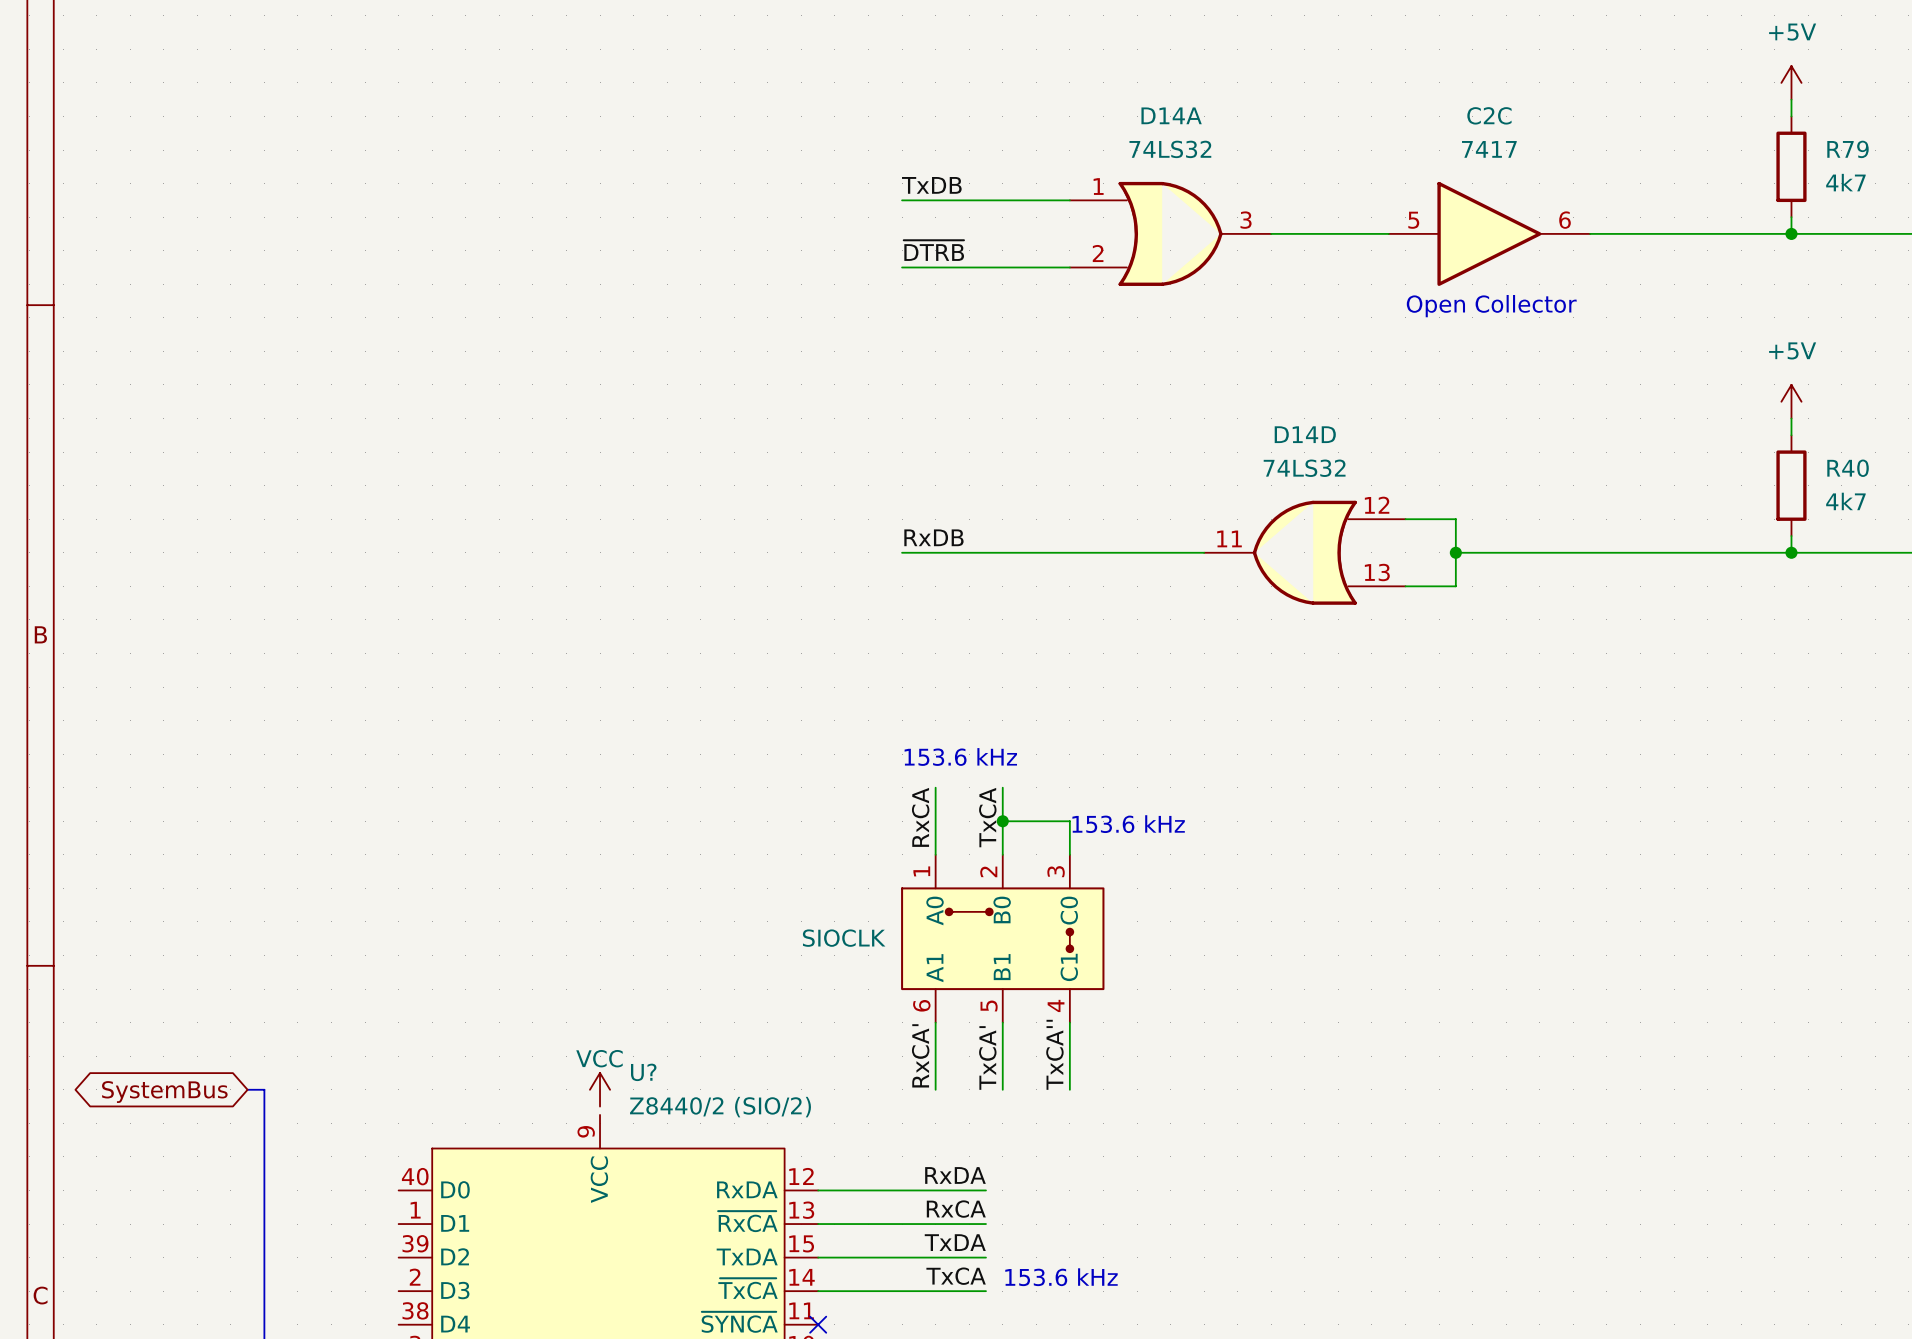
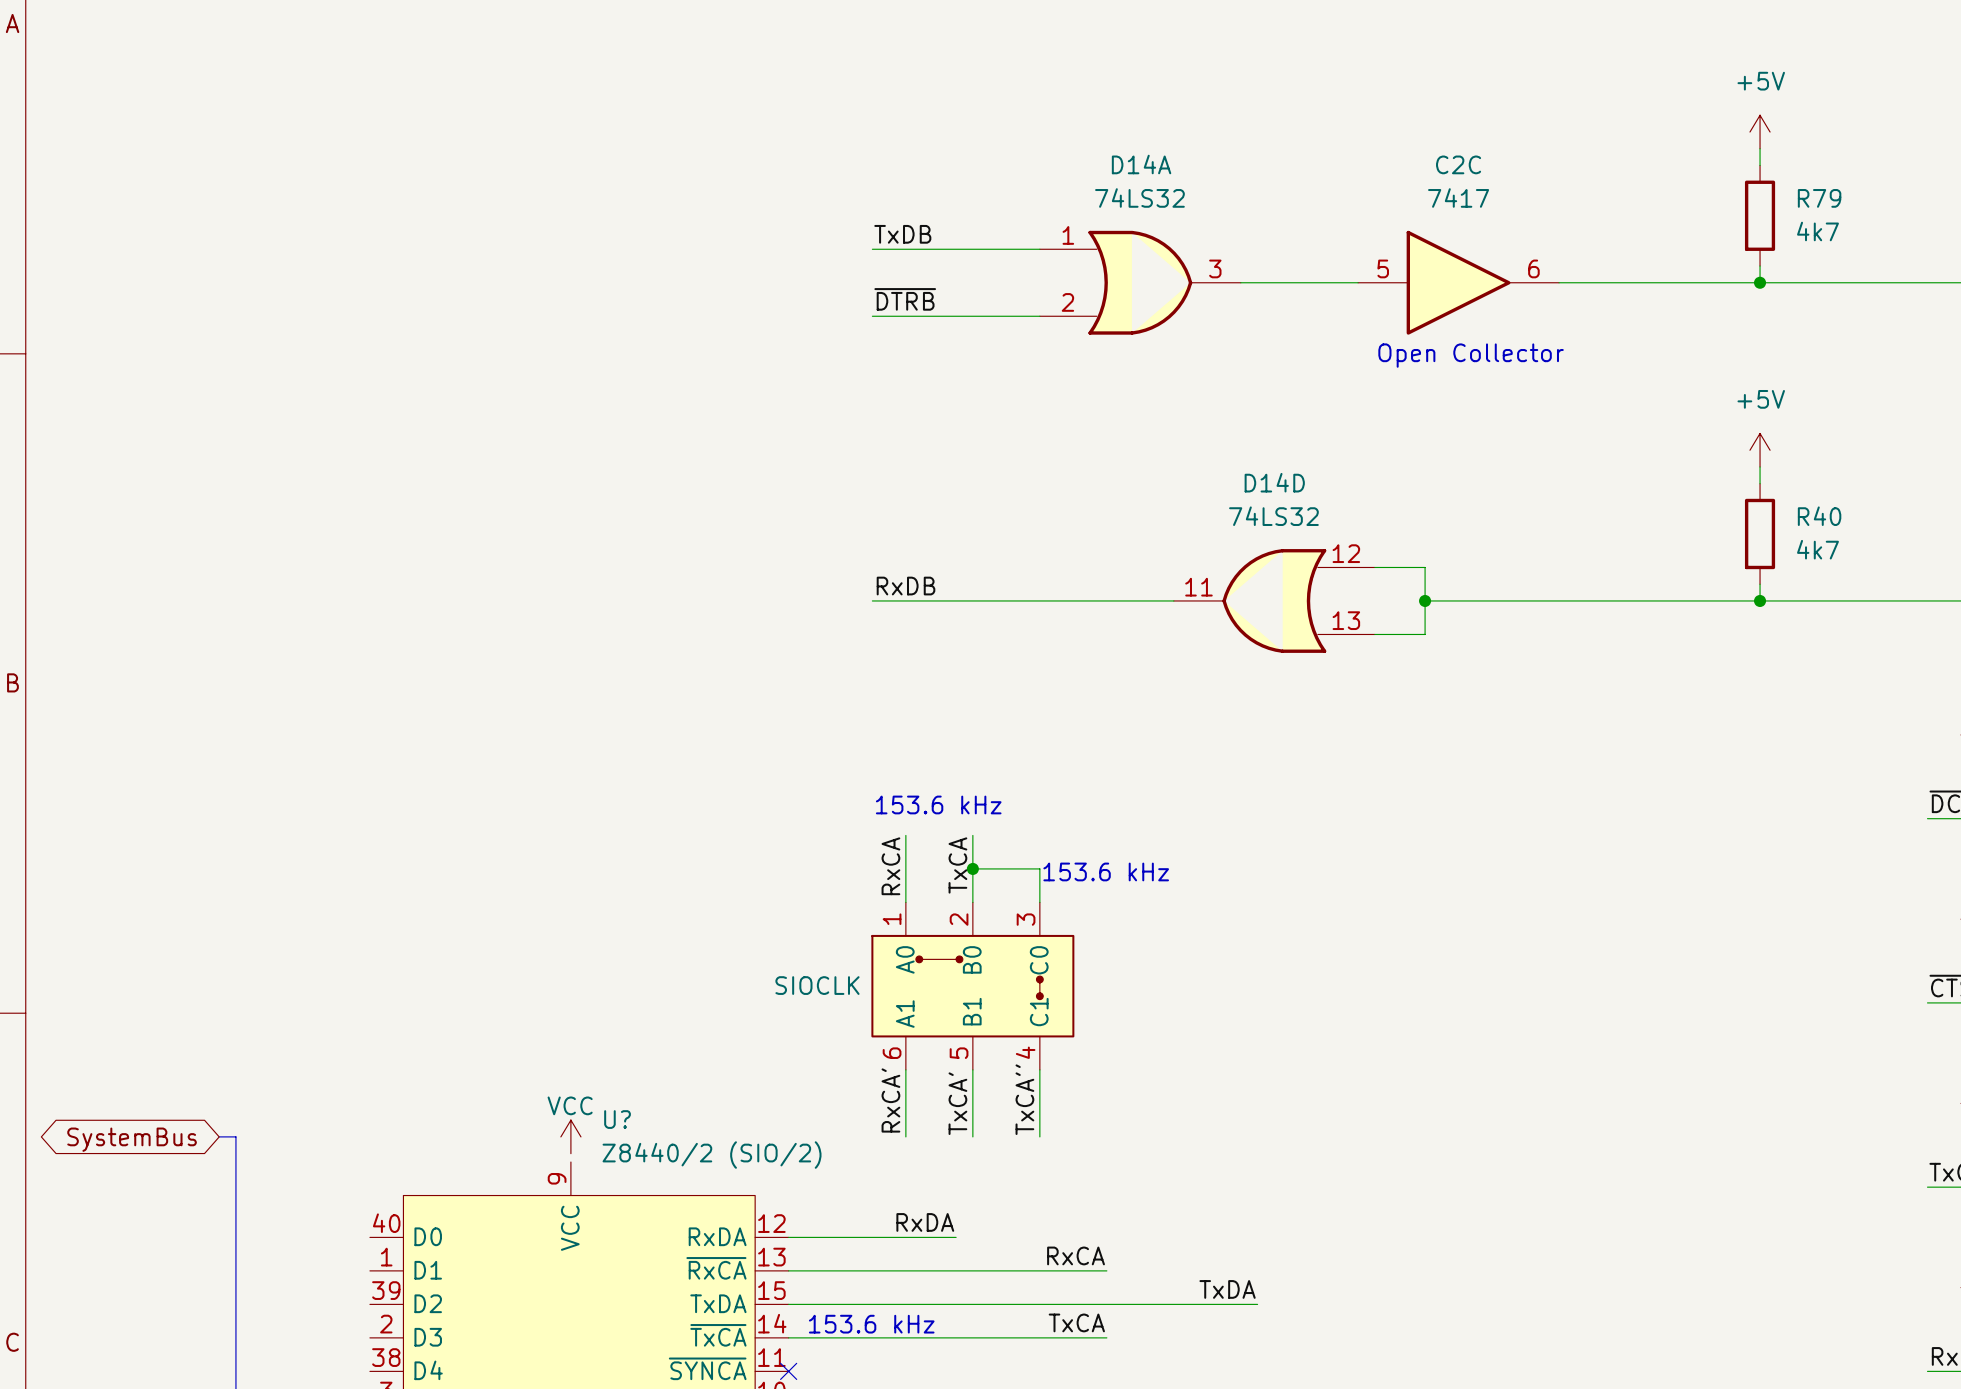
label position: RxCA (956, 1209) -> RxCA (1076, 1255)
wire: none -> (956, 1270) (1106, 1270)
label position: TxDA (955, 1242) -> TxDA (1227, 1289)
wire: none -> (956, 1304) (1257, 1304)
label position: TxCA (956, 1276) -> TxCA (1076, 1322)
text position: 153.6 kHz (1061, 1277) -> 153.6 kHz (871, 1324)
wire: none -> (956, 1337) (1106, 1337)

